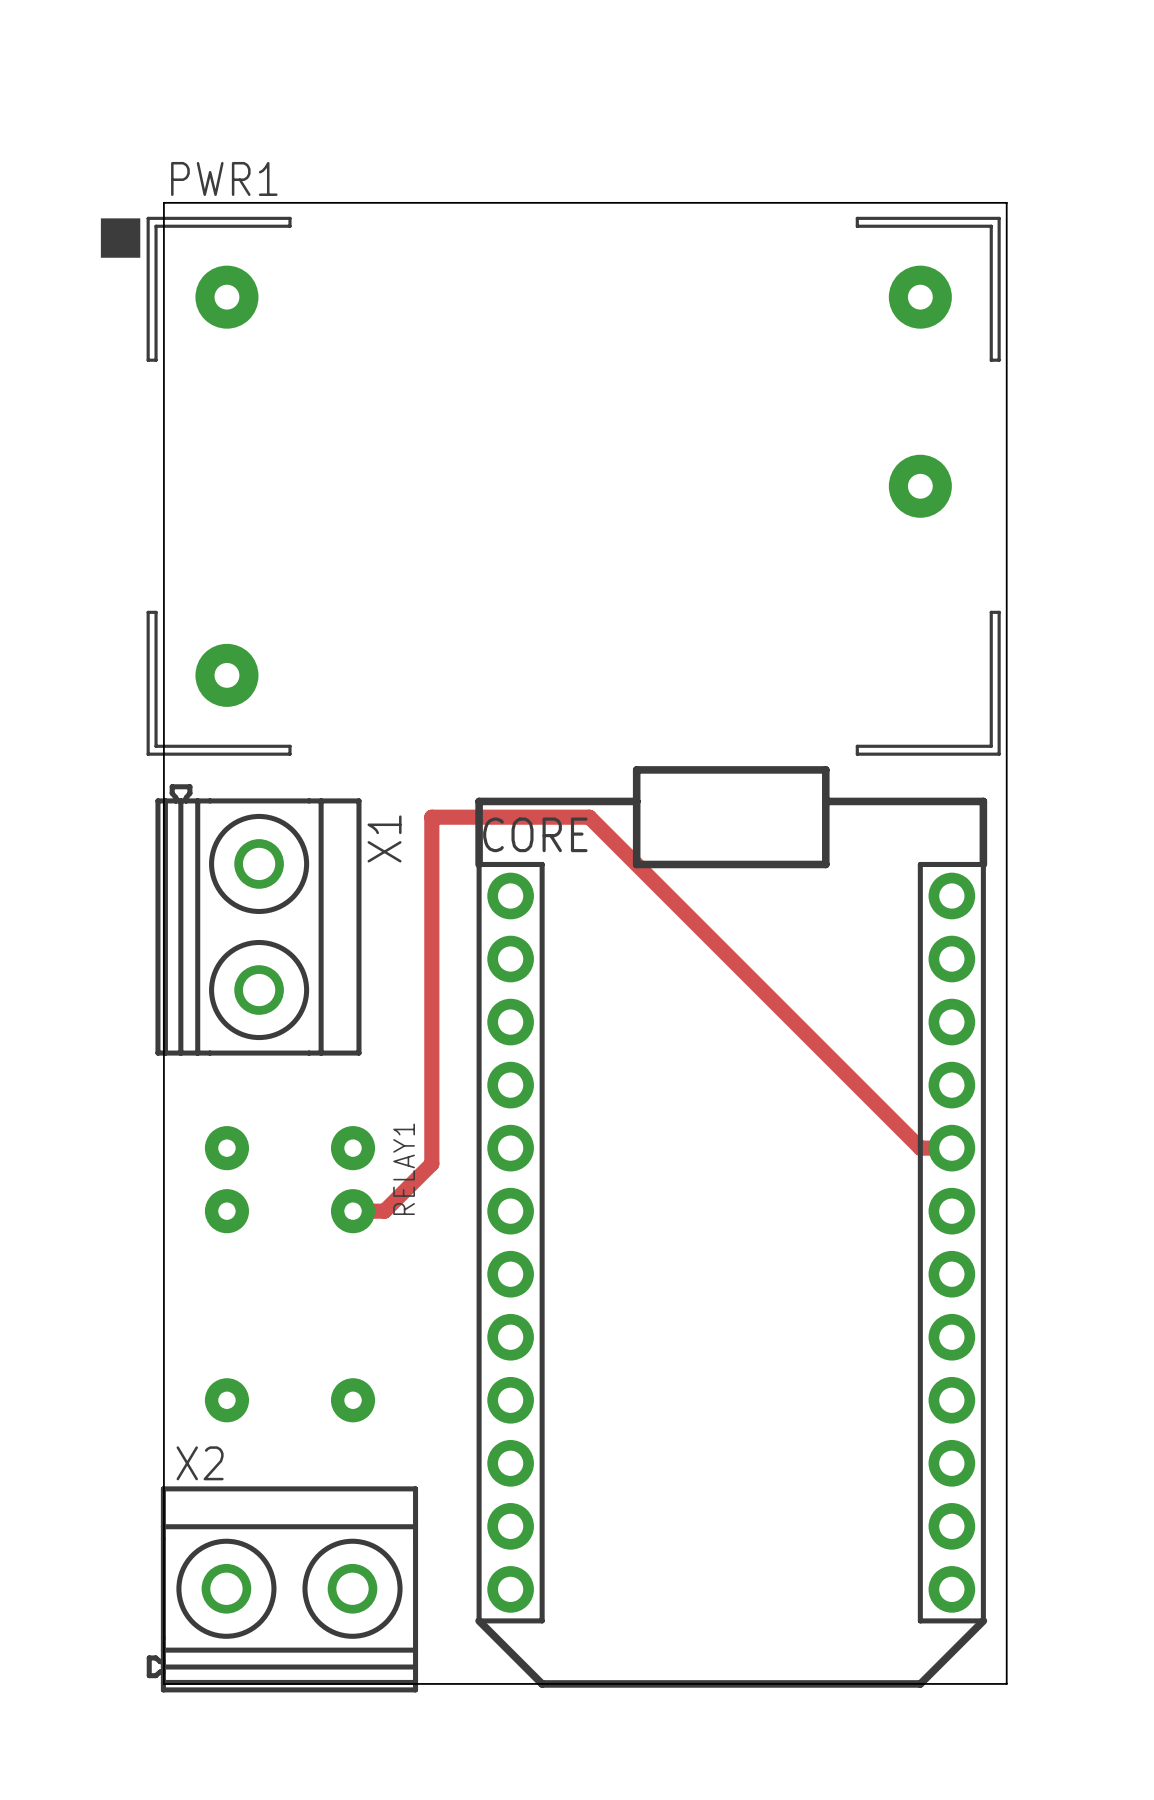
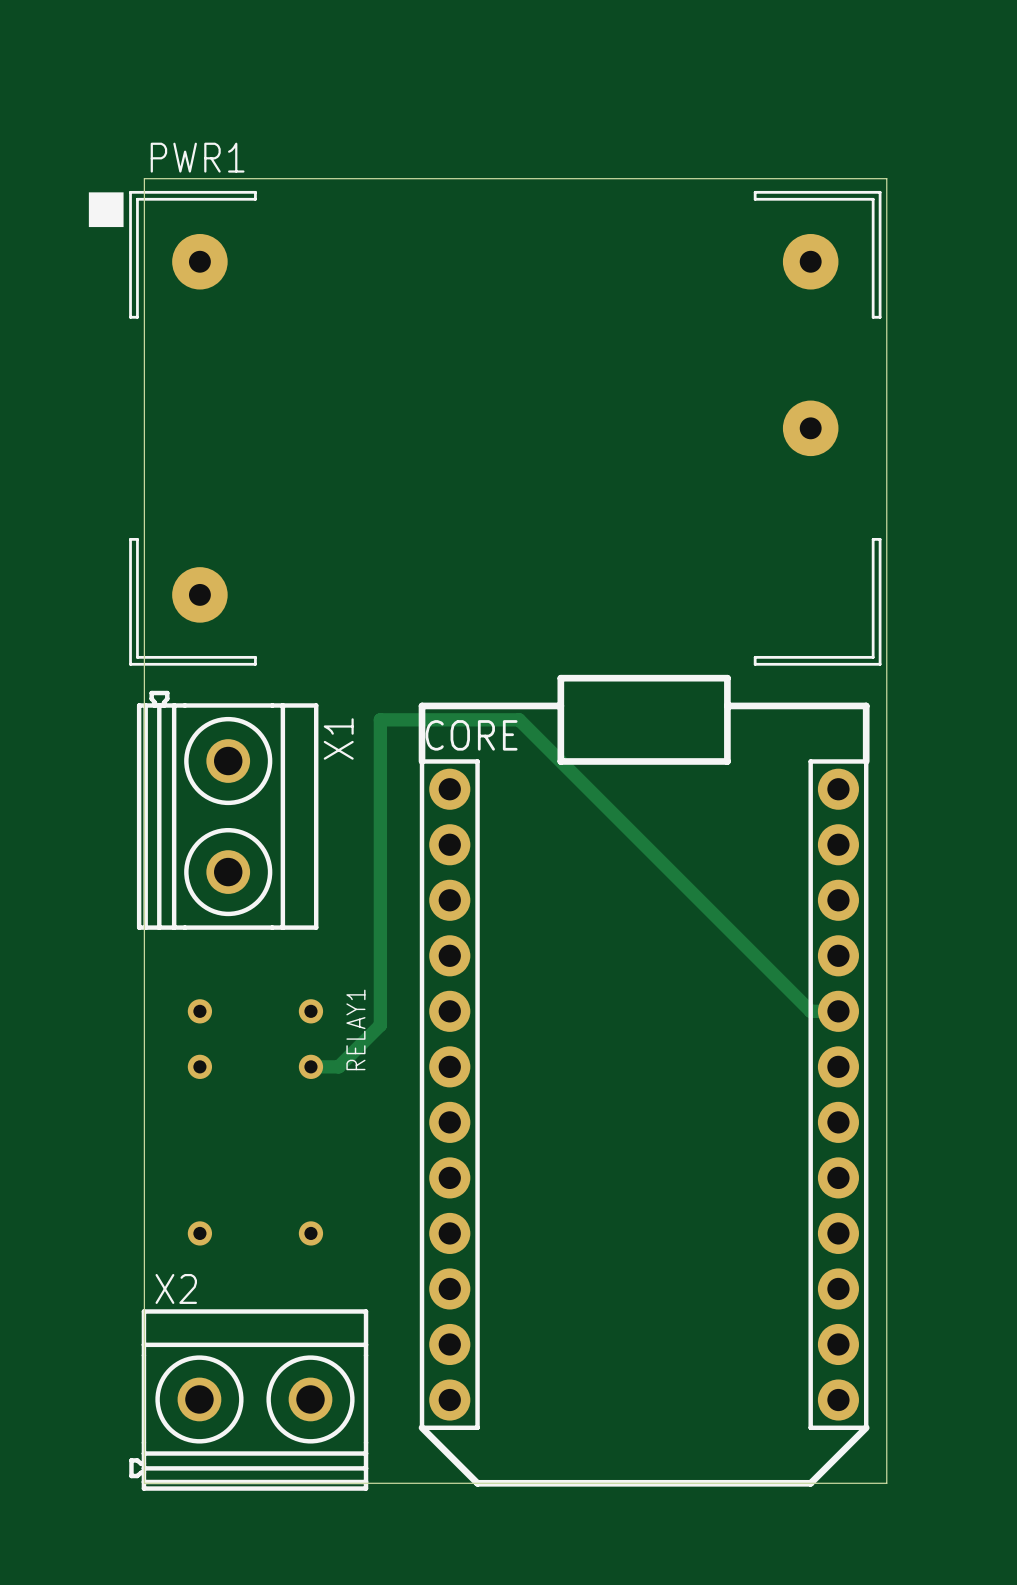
RELAY1 footprint: [204, 1126, 376, 1423] -> [187, 999, 324, 1246]

